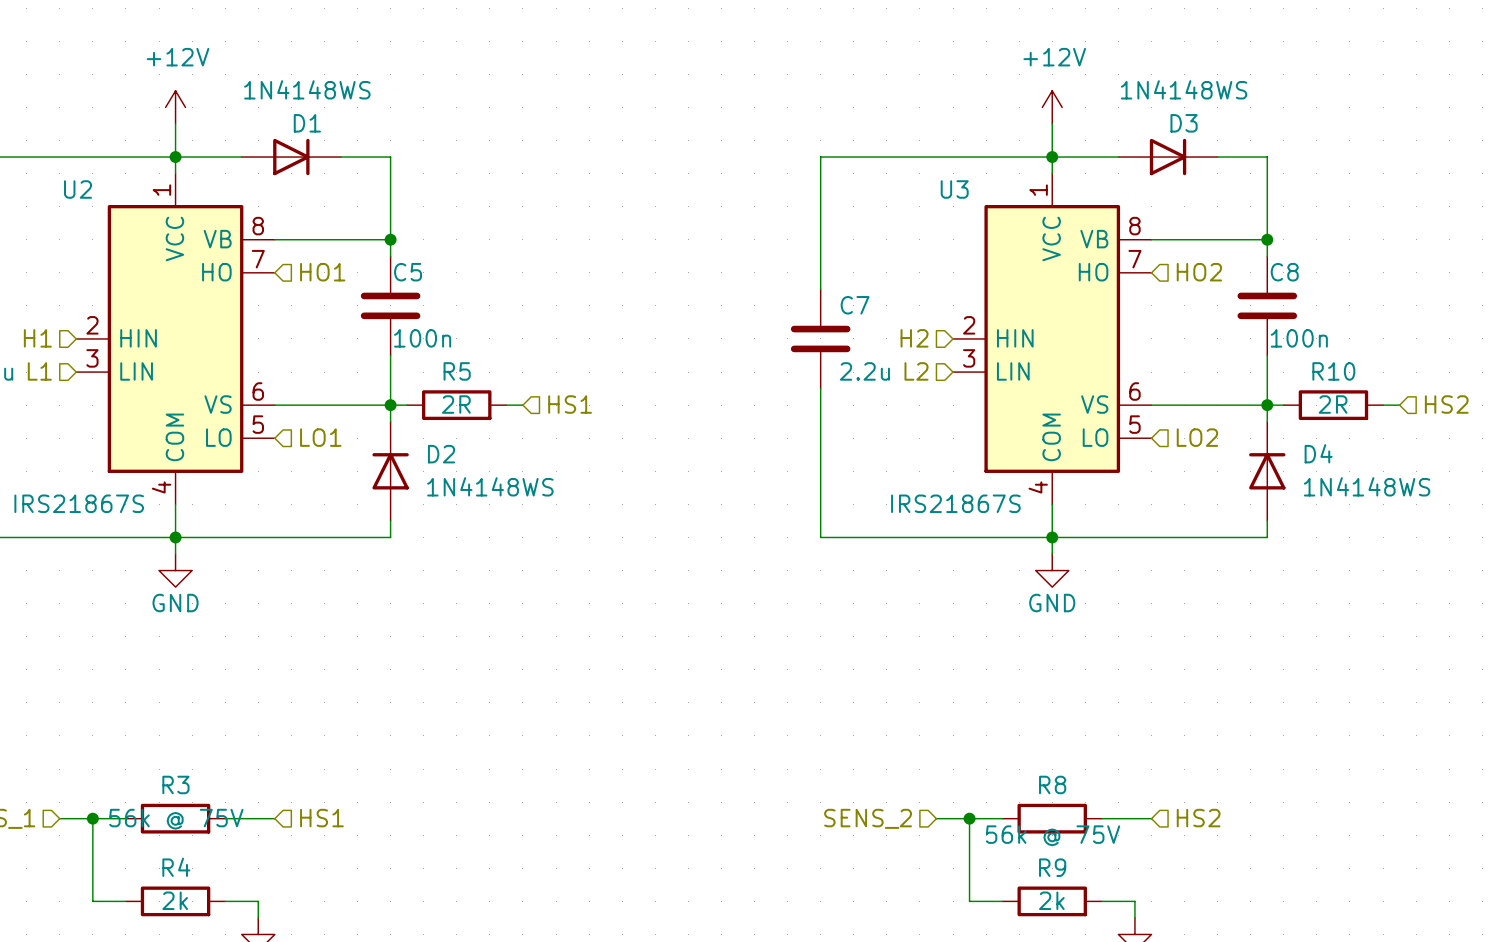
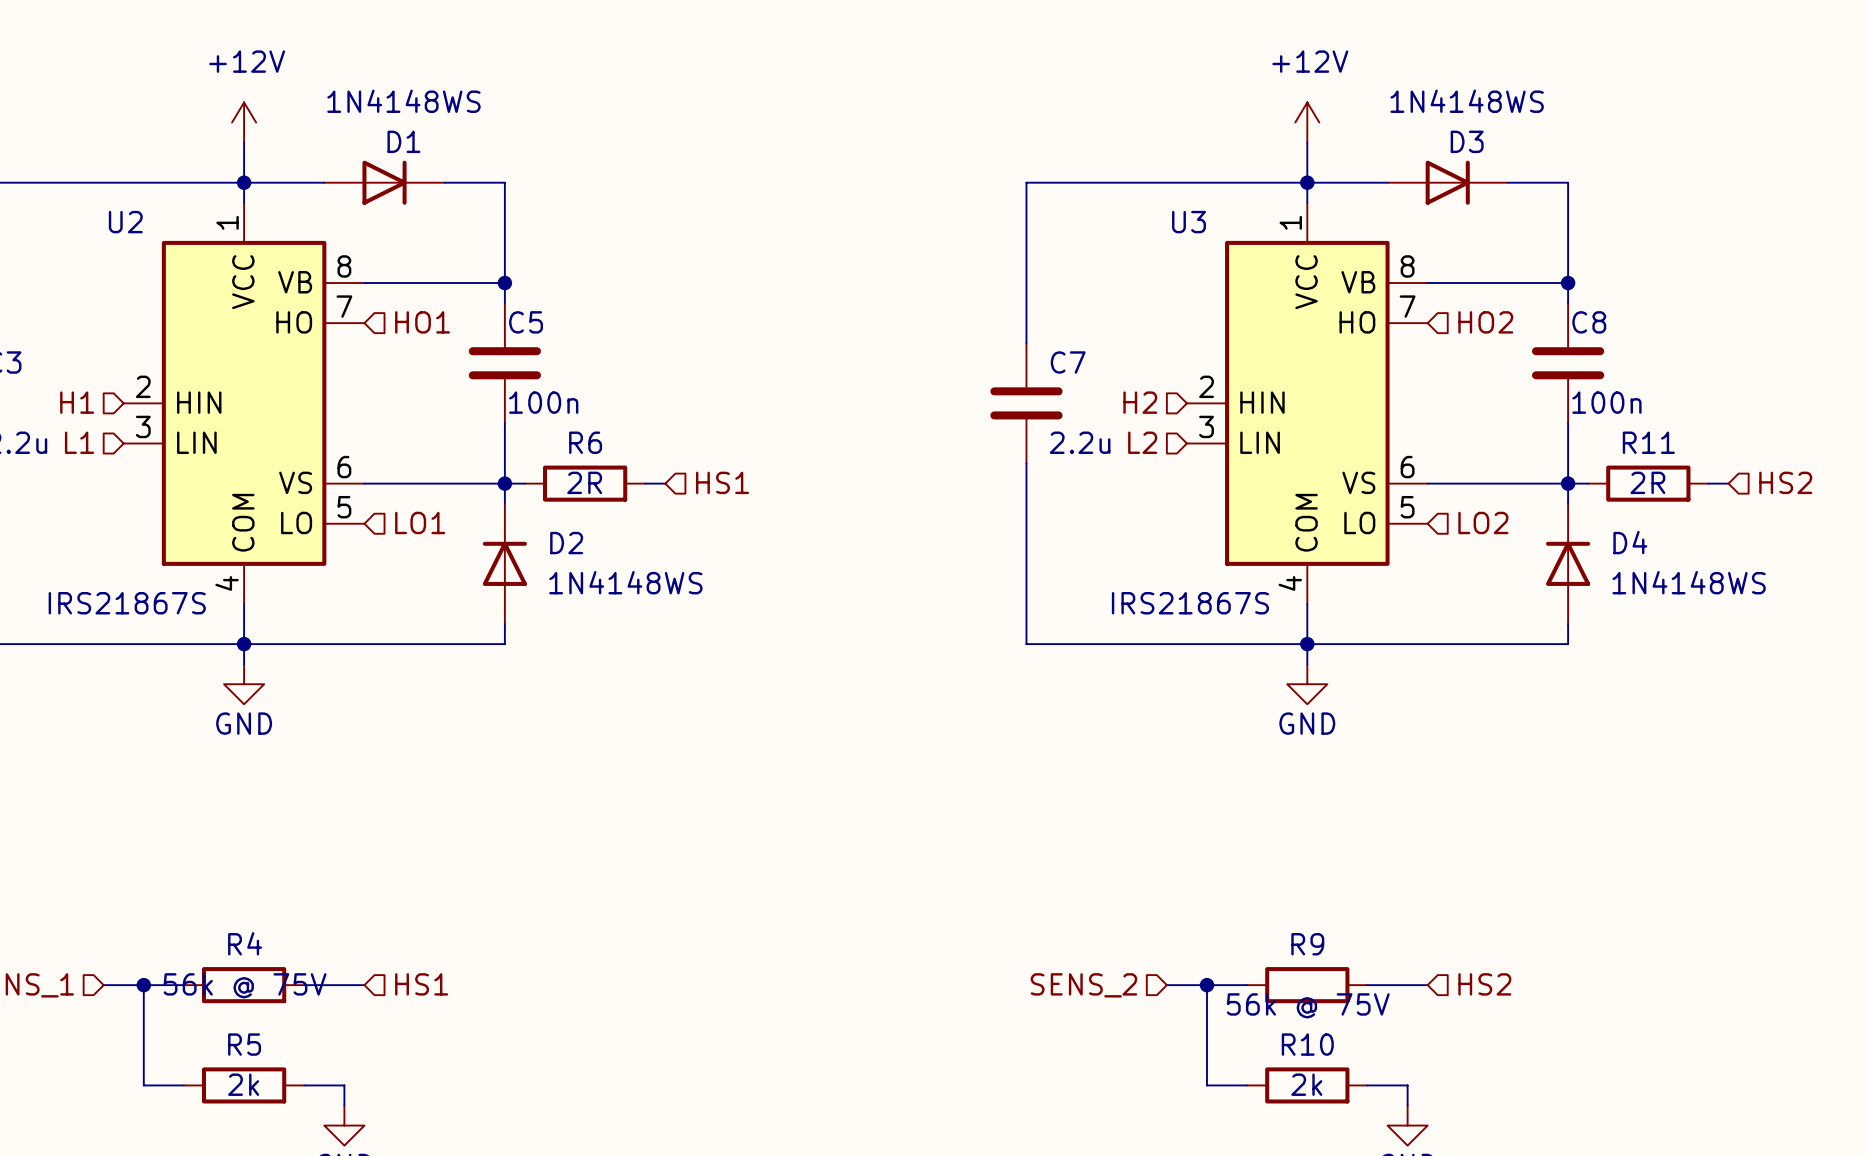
R5 name: R5 (457, 371) -> R6 (585, 442)
R10 name: R10 (1333, 371) -> R11 (1648, 442)
R3 name: R3 (175, 784) -> R4 (245, 943)
R8 name: R8 (1052, 784) -> R9 (1307, 944)
R4 name: R4 (176, 867) -> R5 (244, 1044)
R9 name: R9 (1052, 867) -> R10 (1307, 1044)

